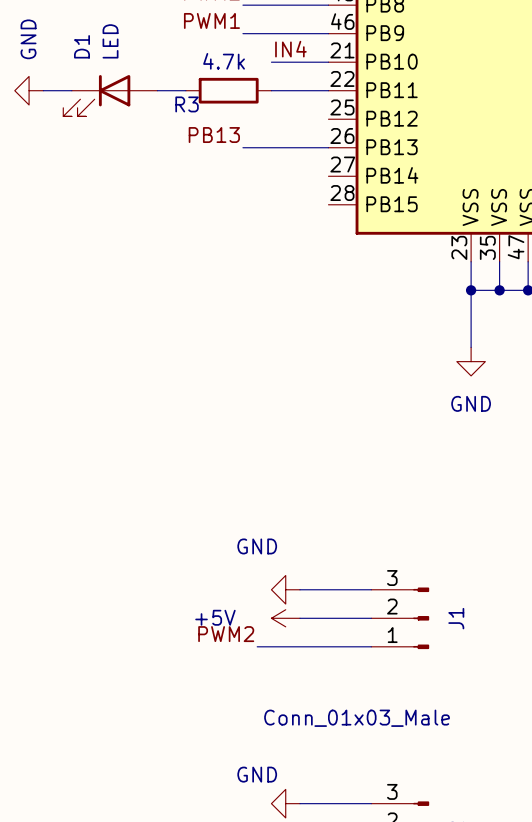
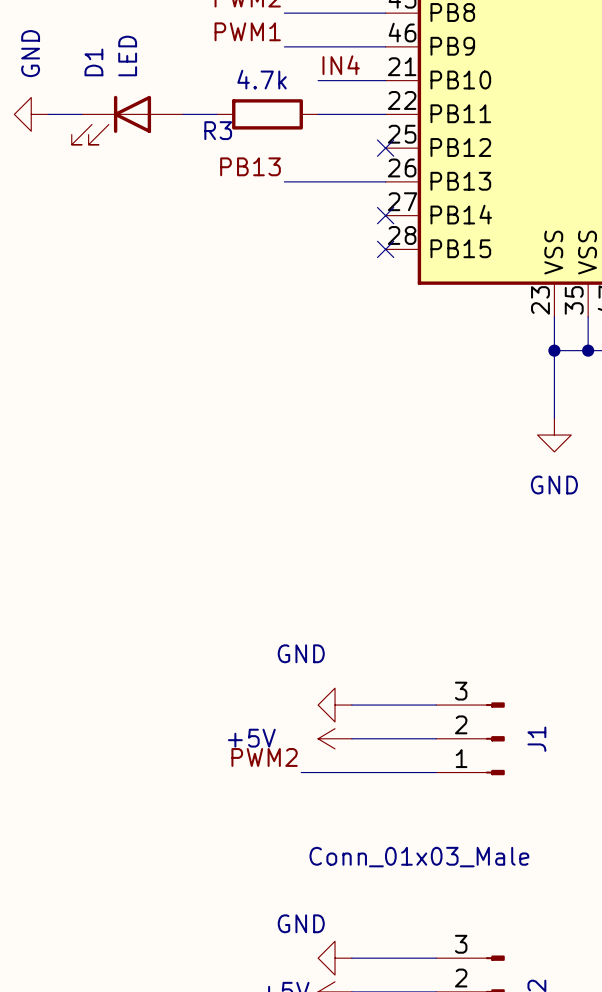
no-connect mark: none -> (385, 148)
no-connect mark: none -> (385, 215)
no-connect mark: none -> (385, 249)

